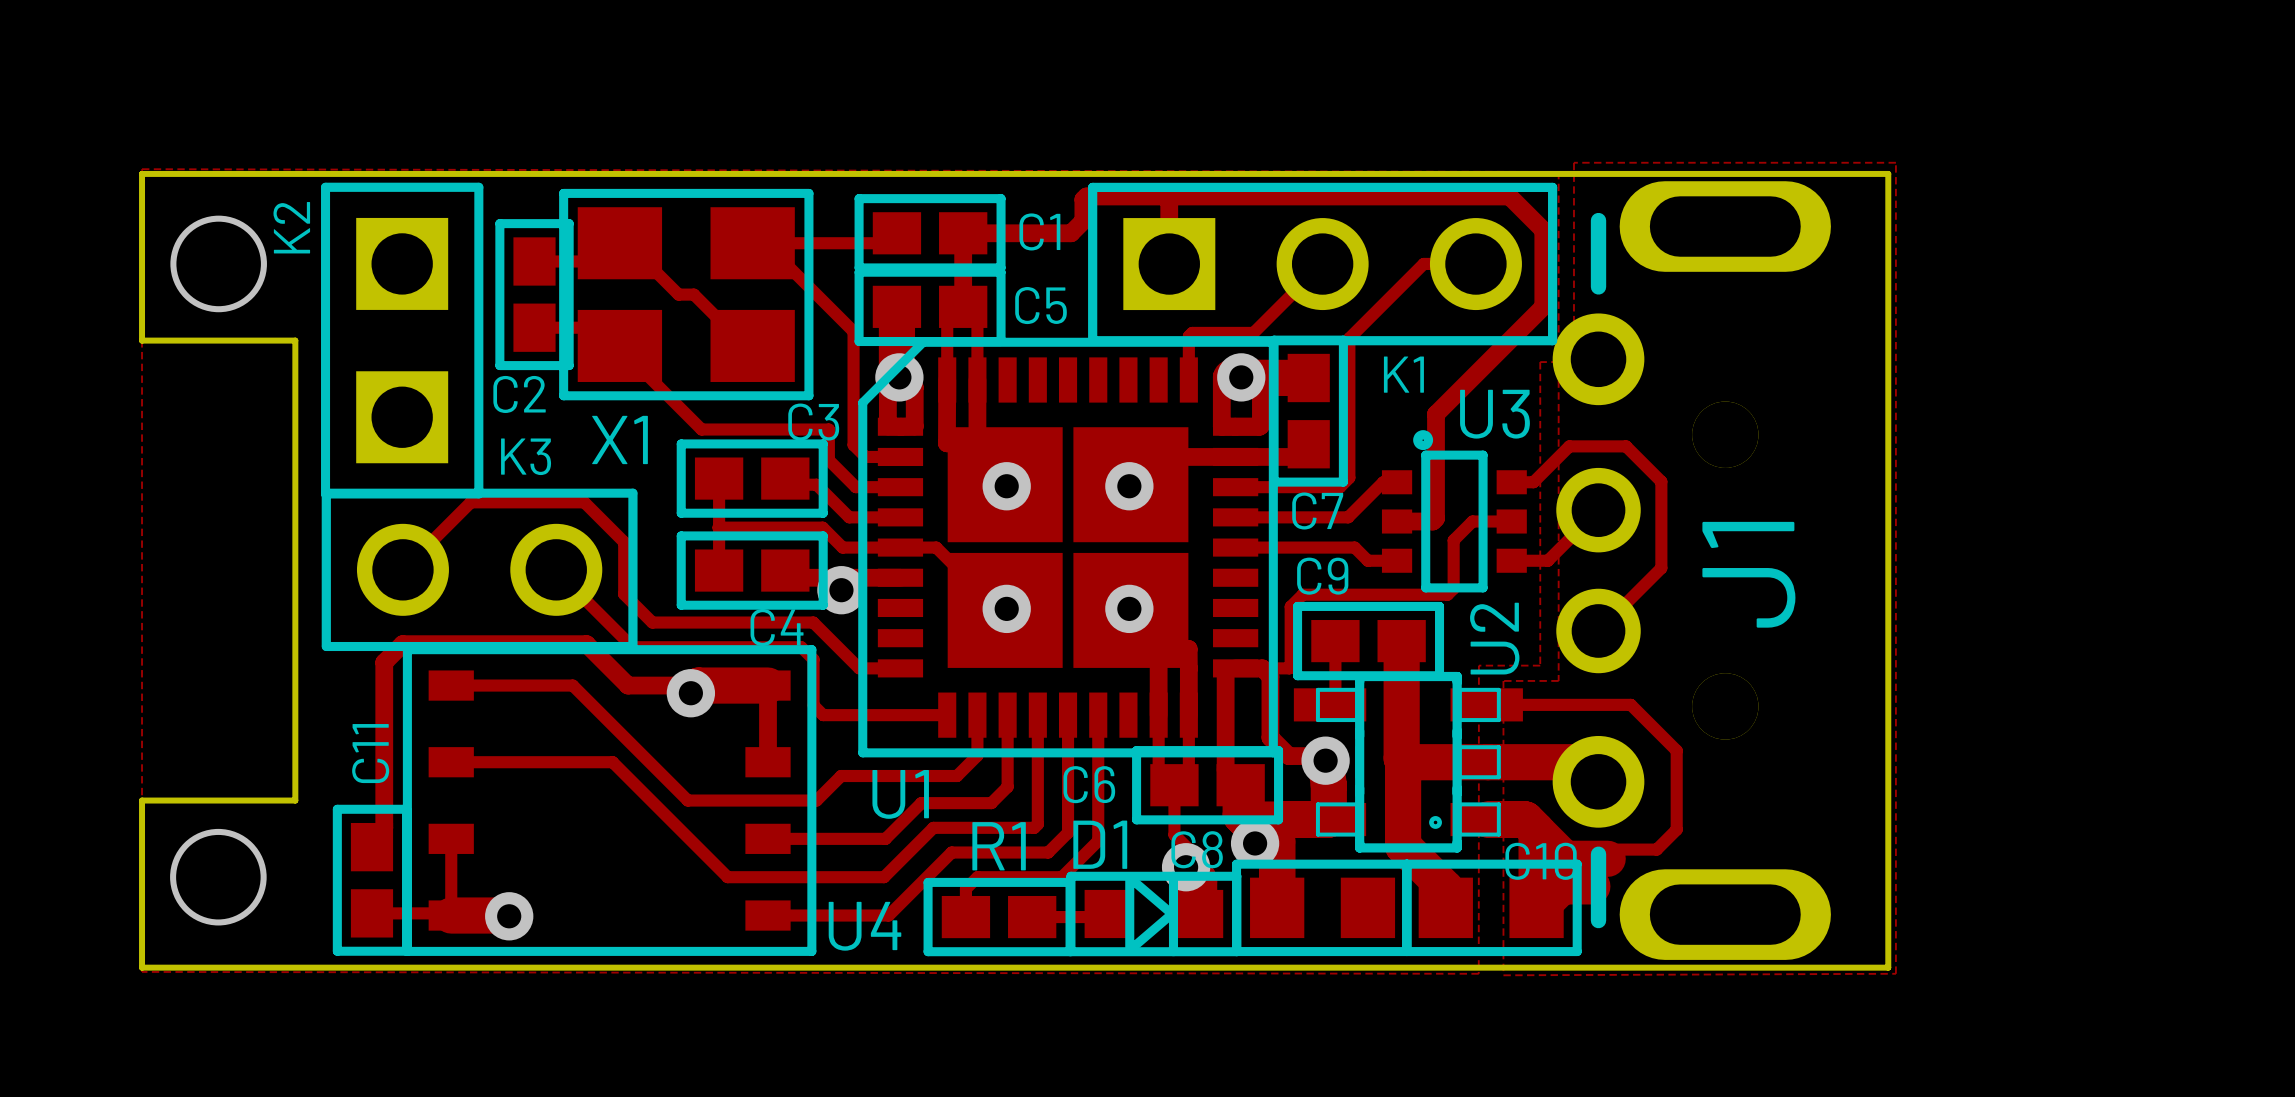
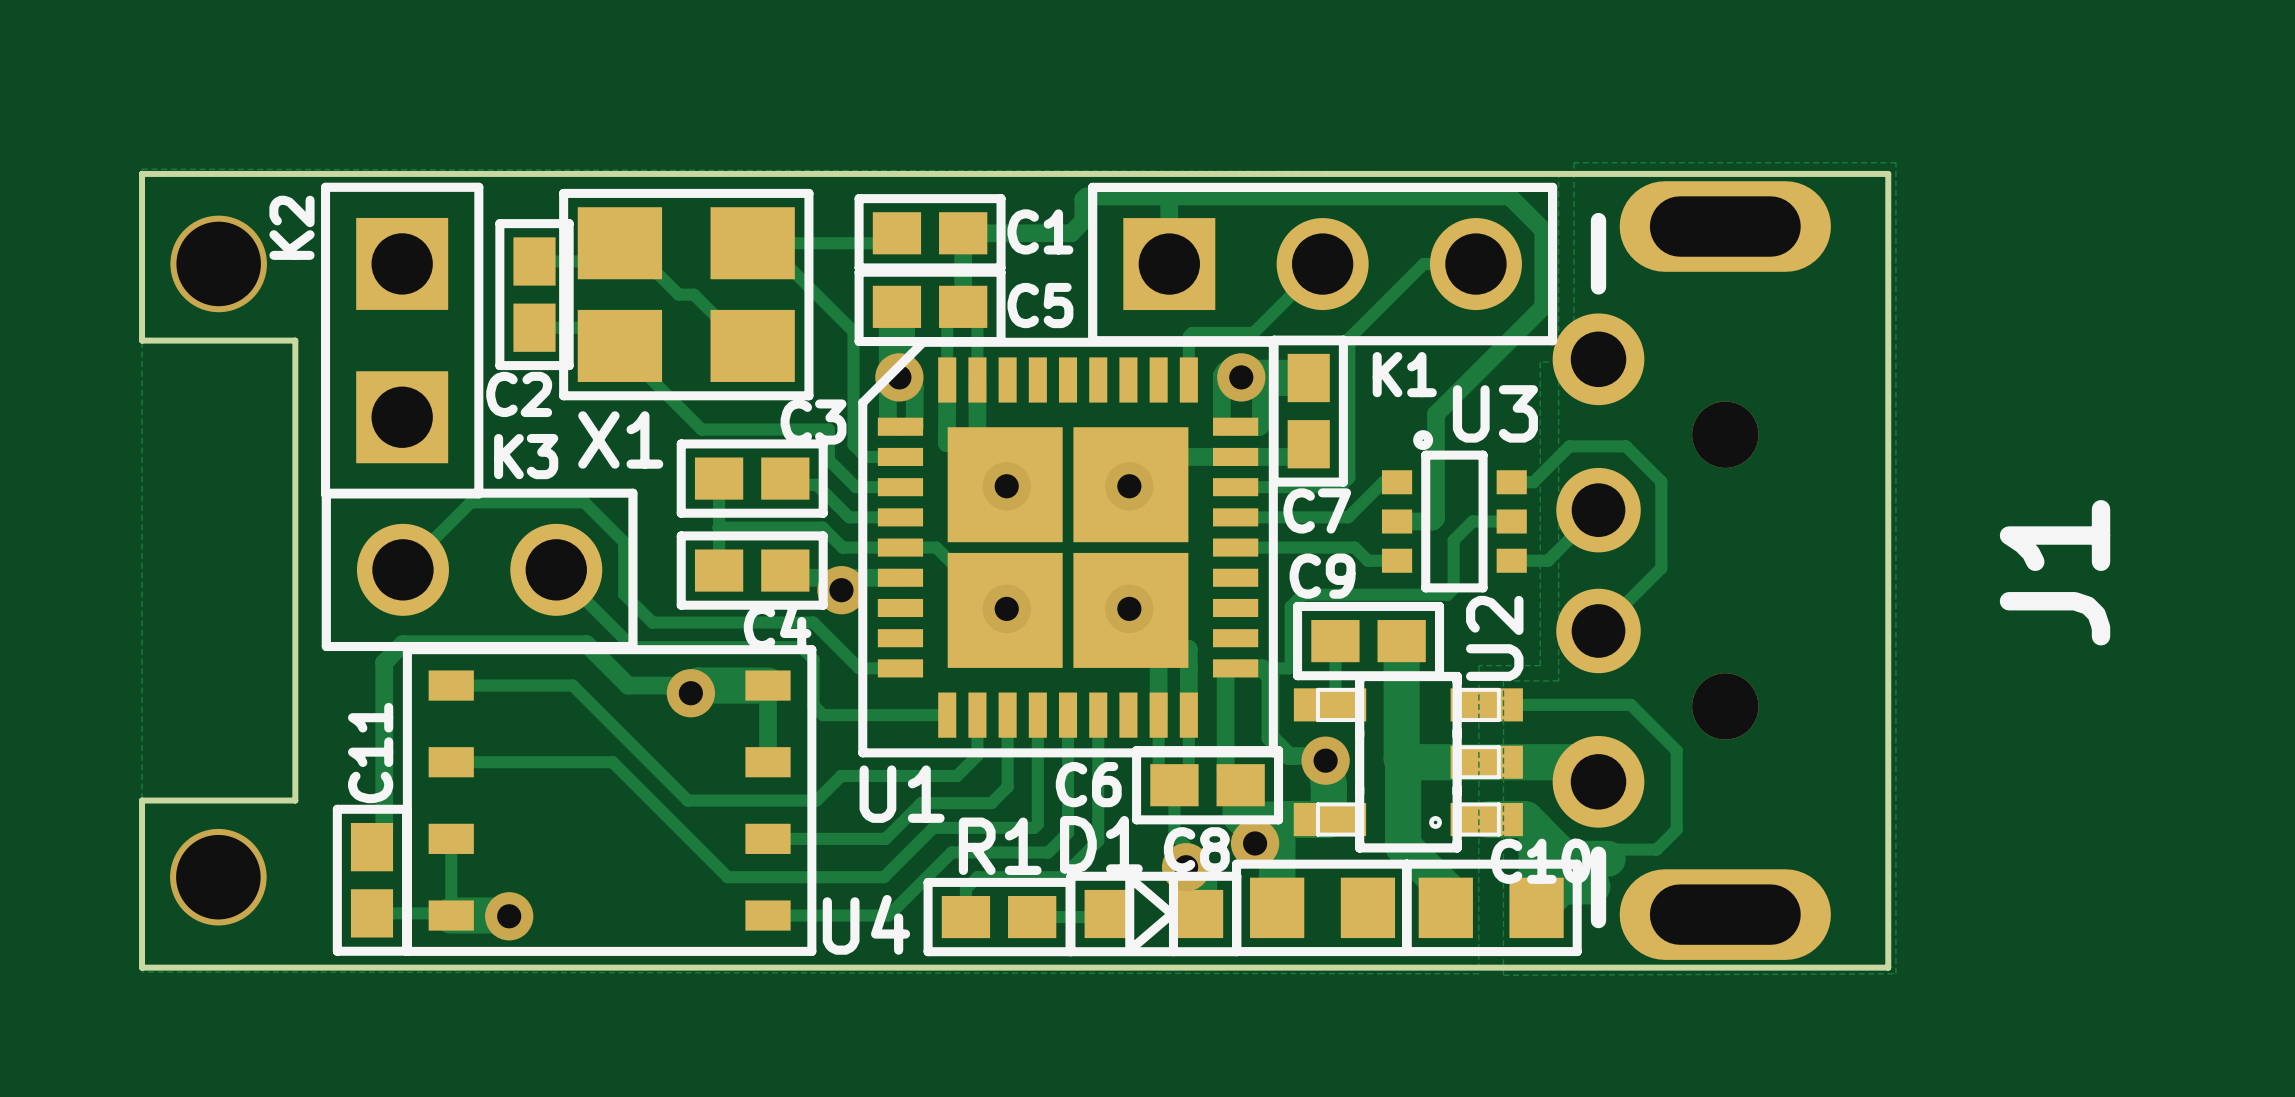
J1 name position: J1 (1748, 574) -> J1 (2055, 572)

